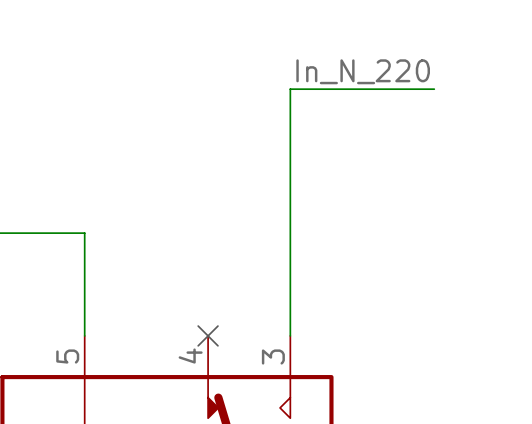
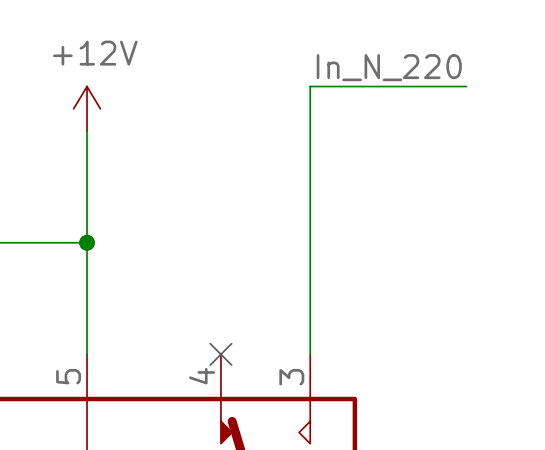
power symbol: none -> +12V (87, 108)
wire: none -> (87, 131) (87, 242)
junction: none -> (87, 242)

